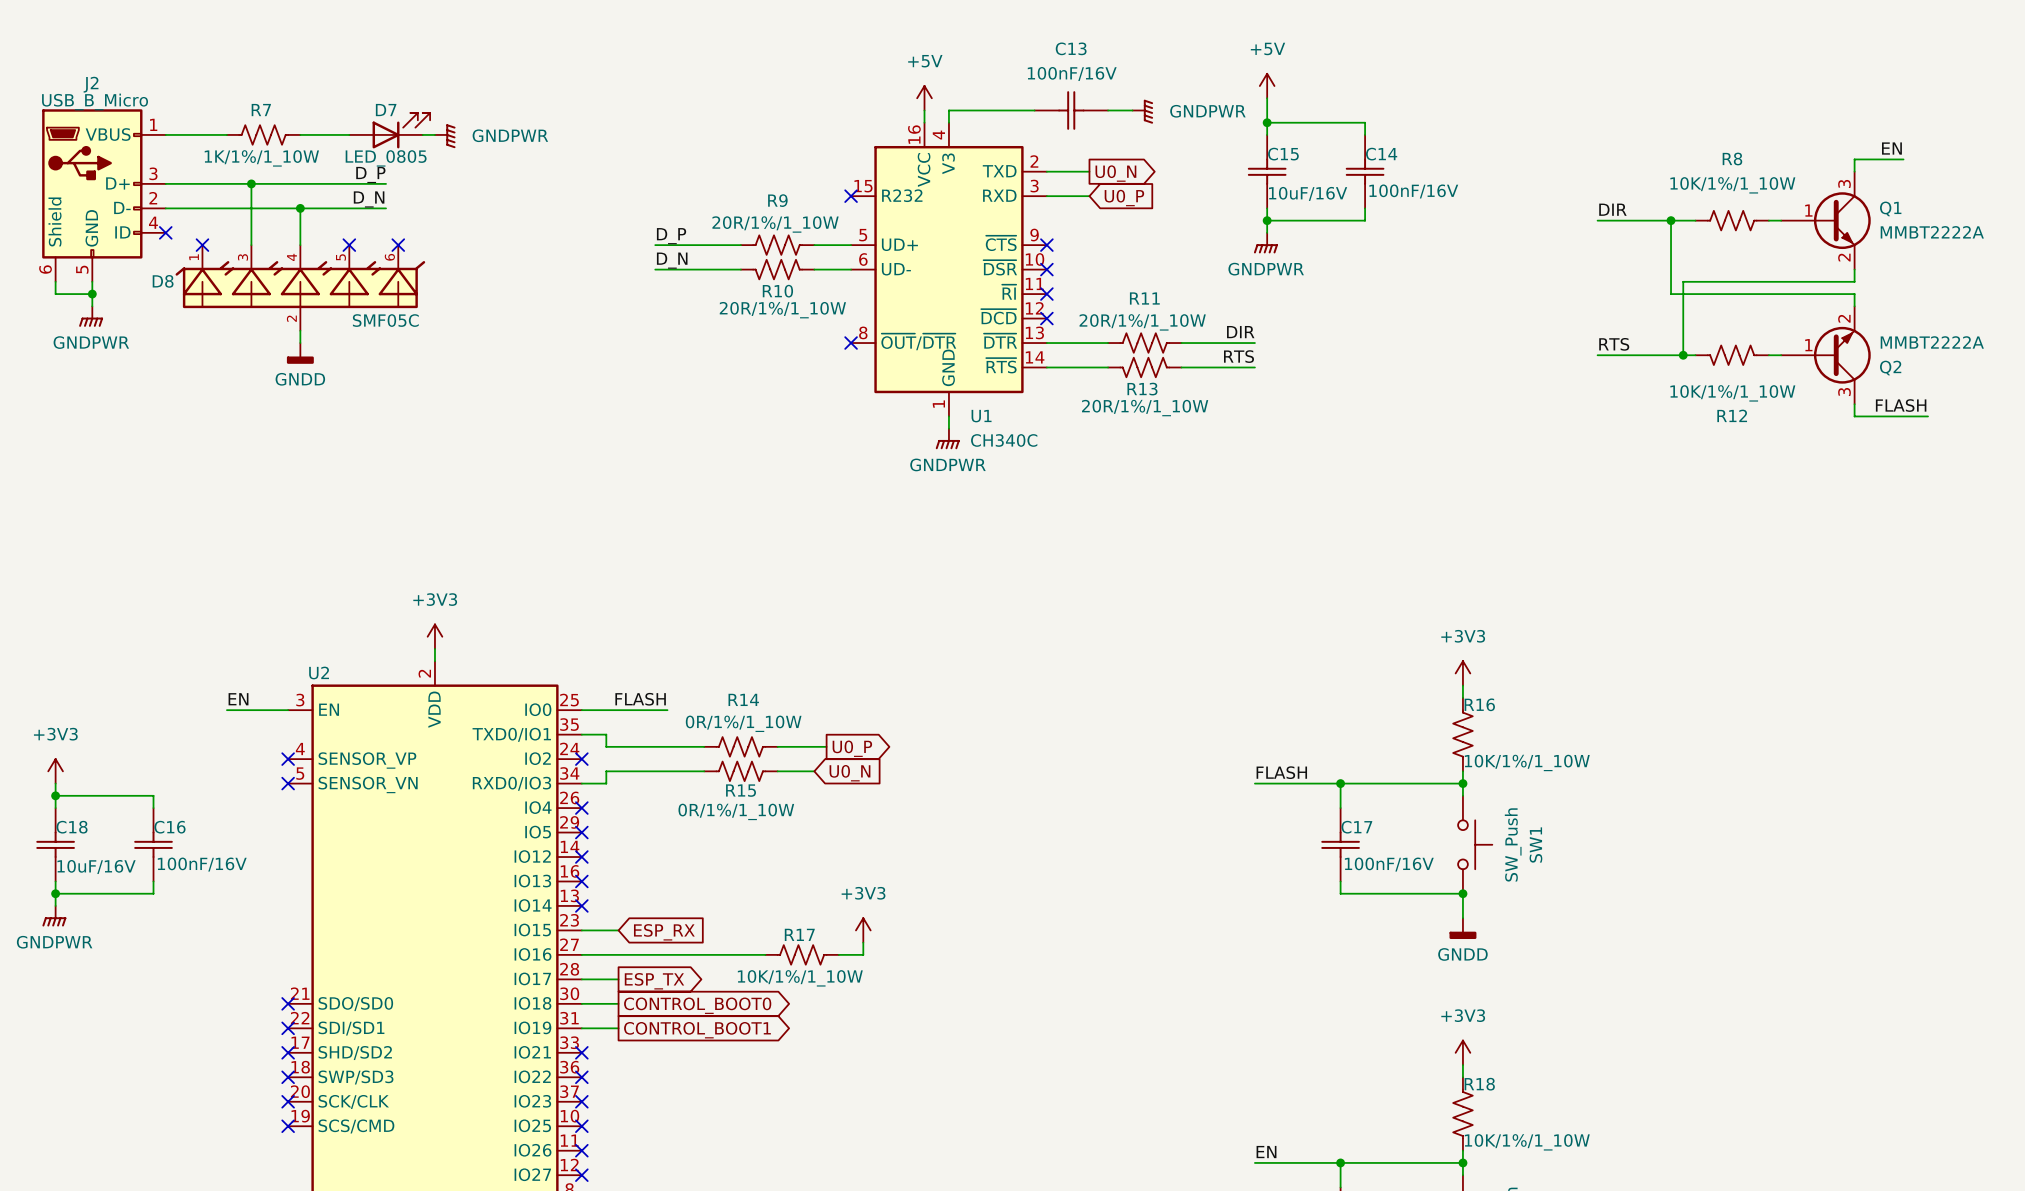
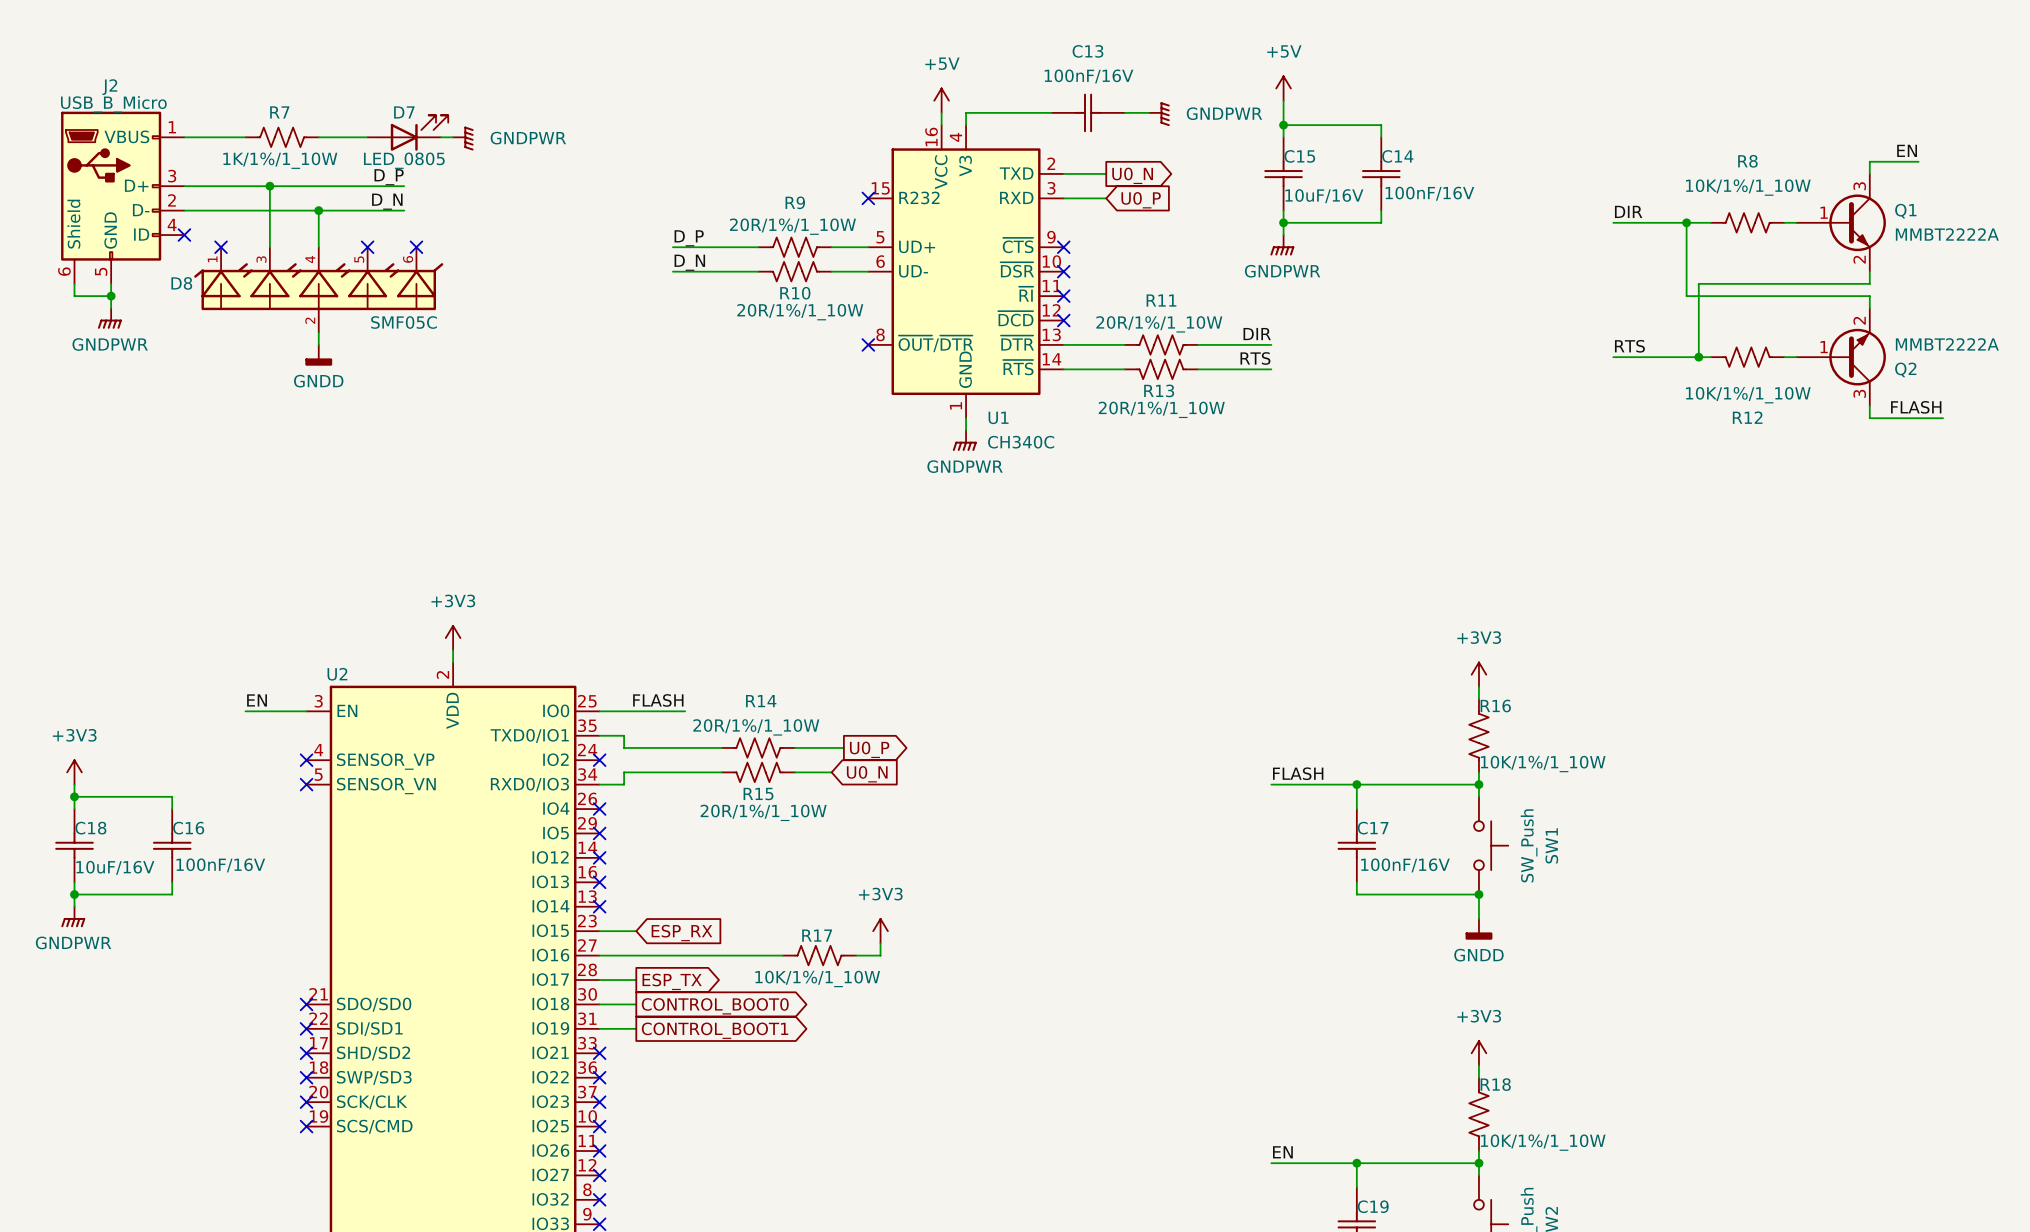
R14 value: 0R/1%/1_10W (743, 723) -> 20R/1%/1_10W (756, 727)
R15 flip: as is (740, 771) -> left-right (758, 772)
R15 value: 0R/1%/1_10W (736, 811) -> 20R/1%/1_10W (763, 812)

